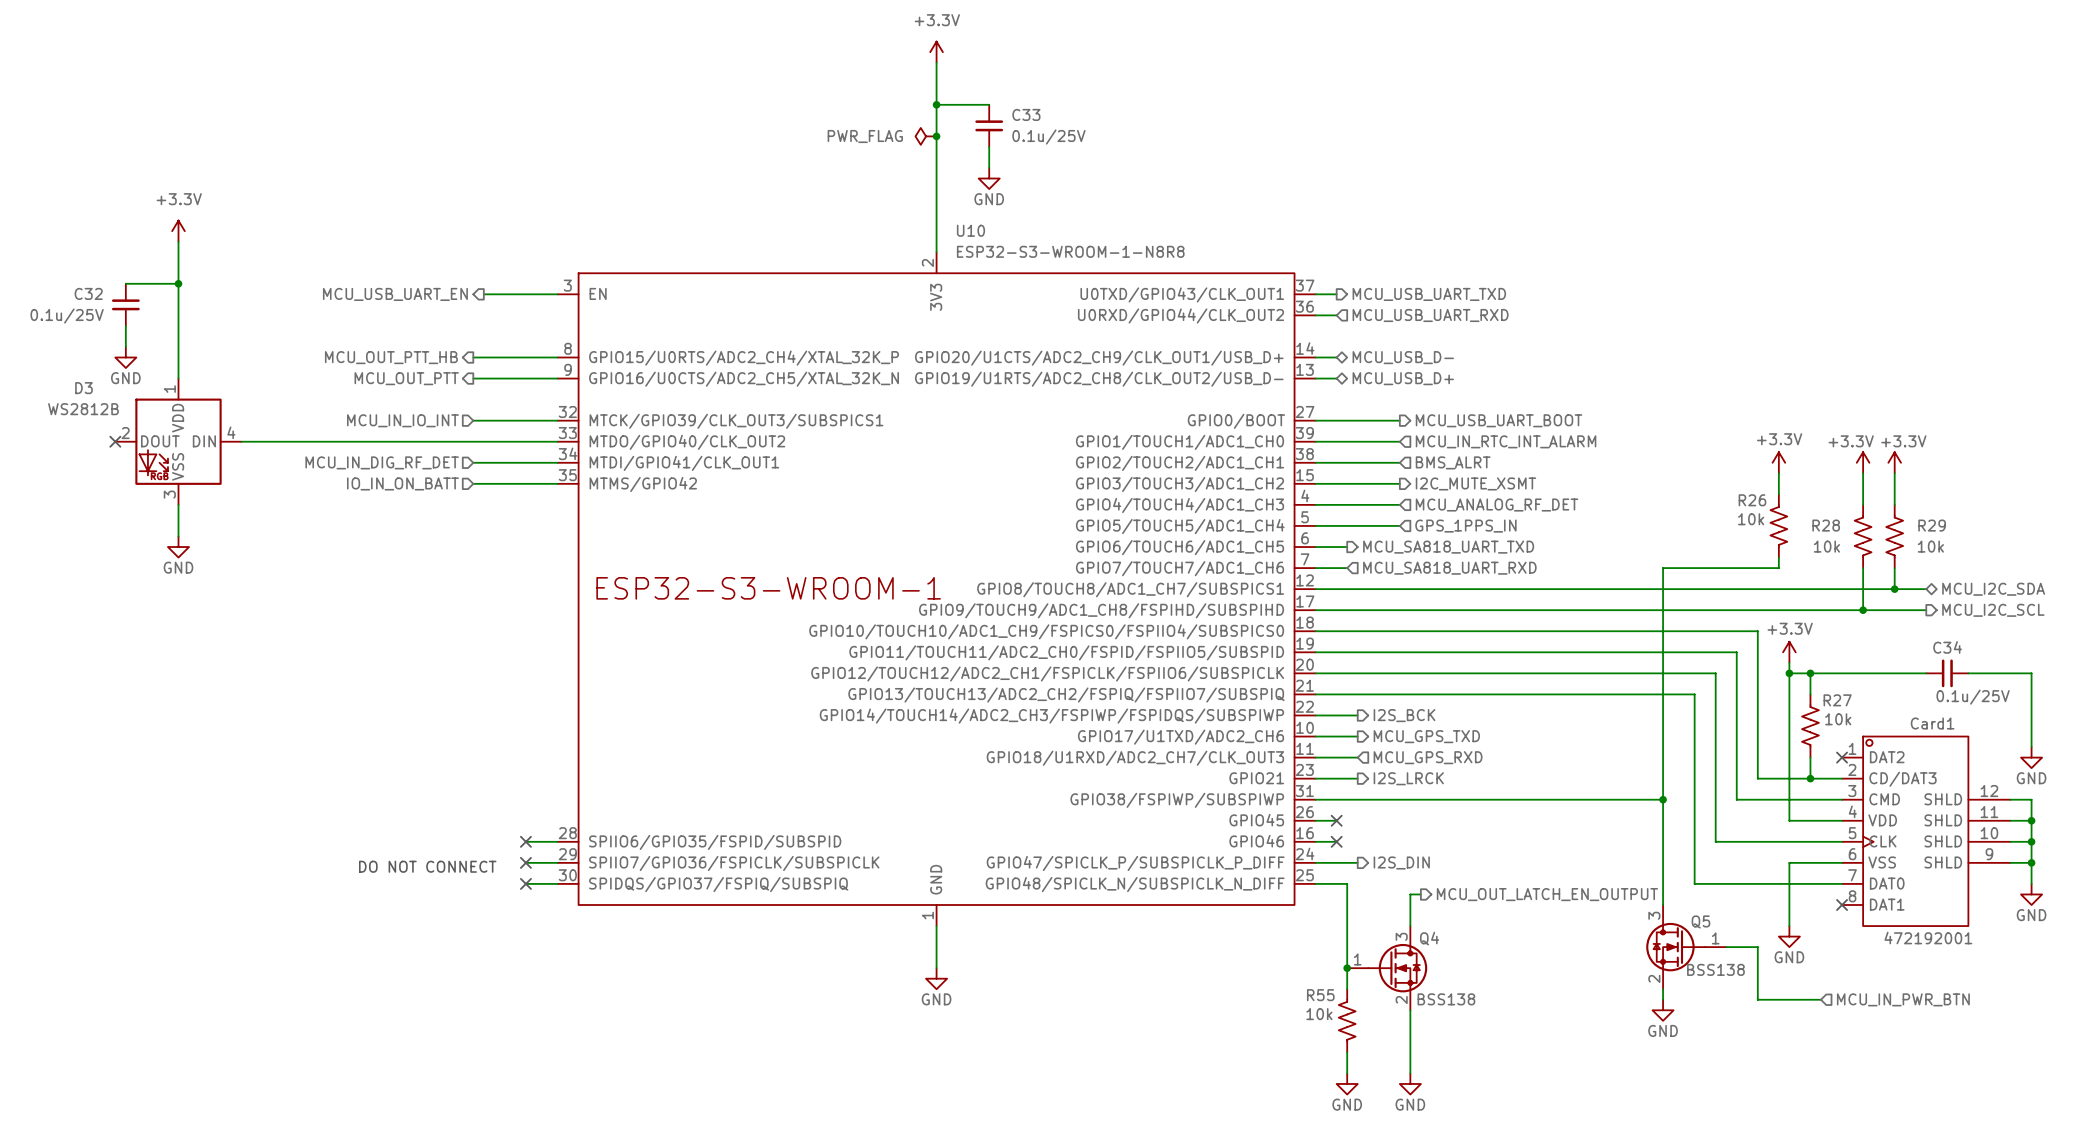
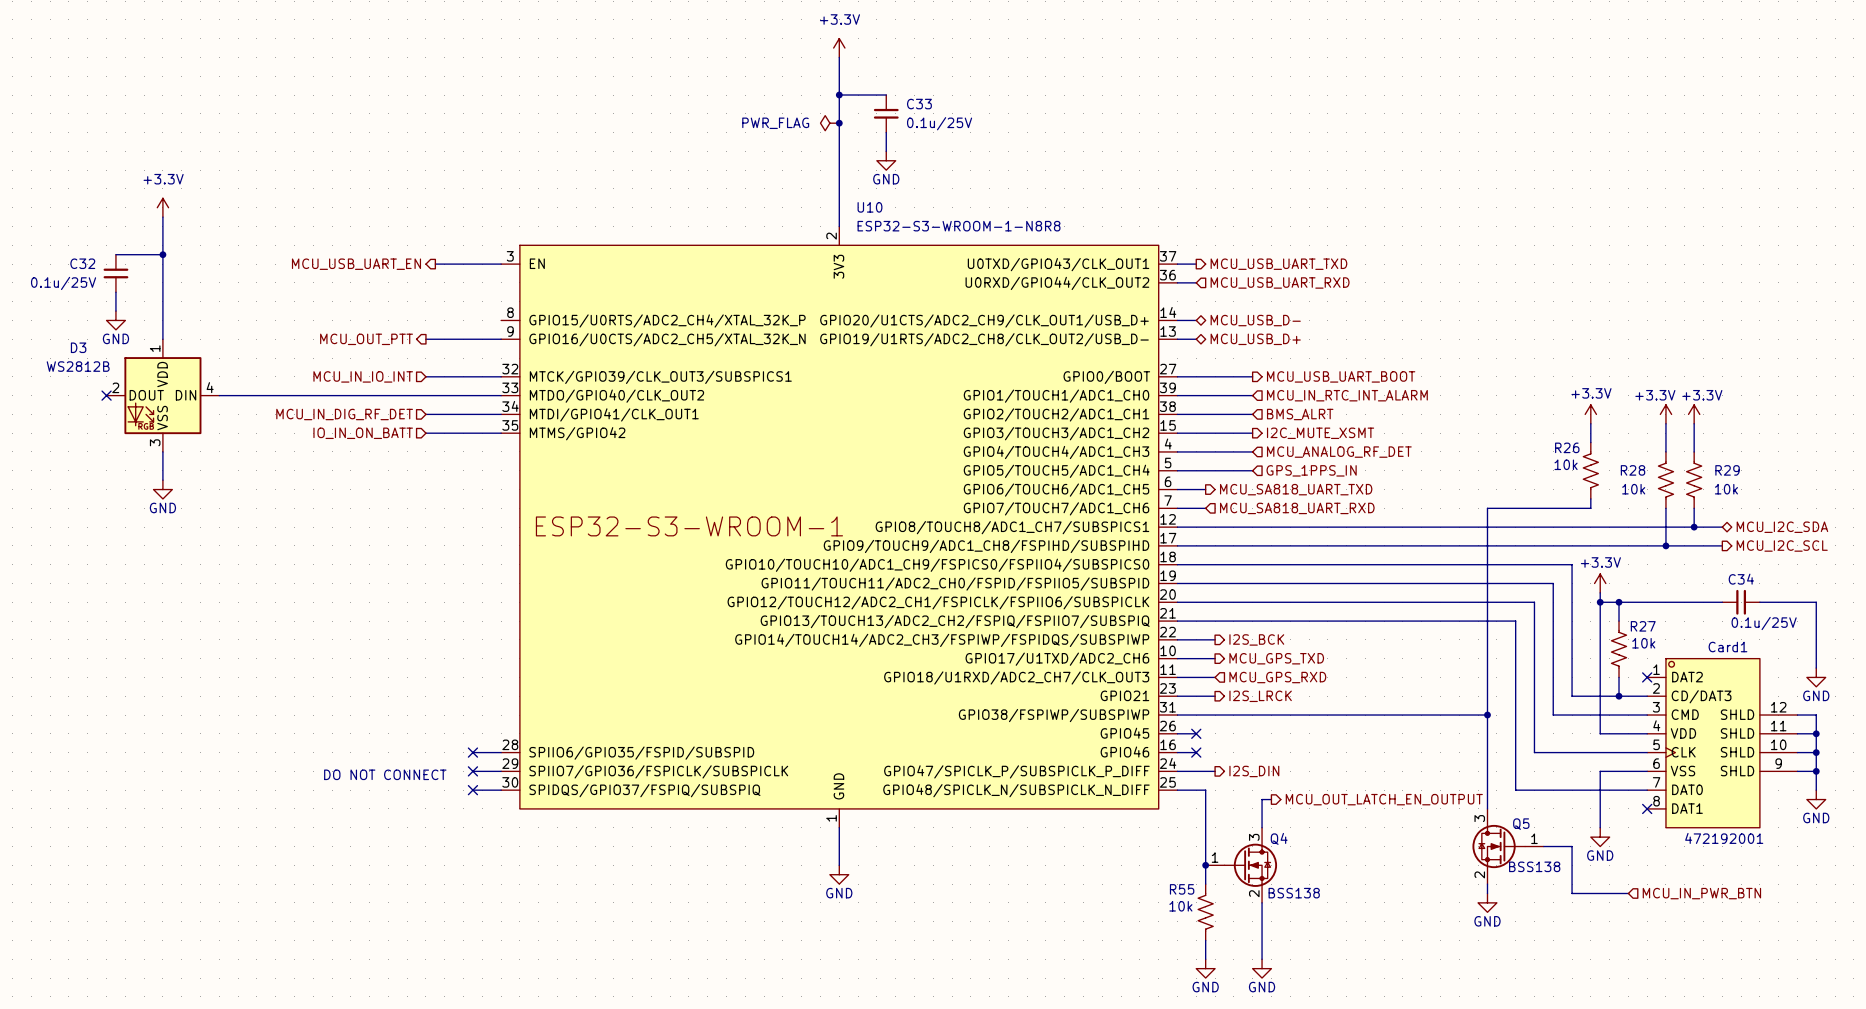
hierarchical label: MCU_OUT_PTT_HB (391, 357) -> none
wire: (473, 357) (557, 357) -> none

